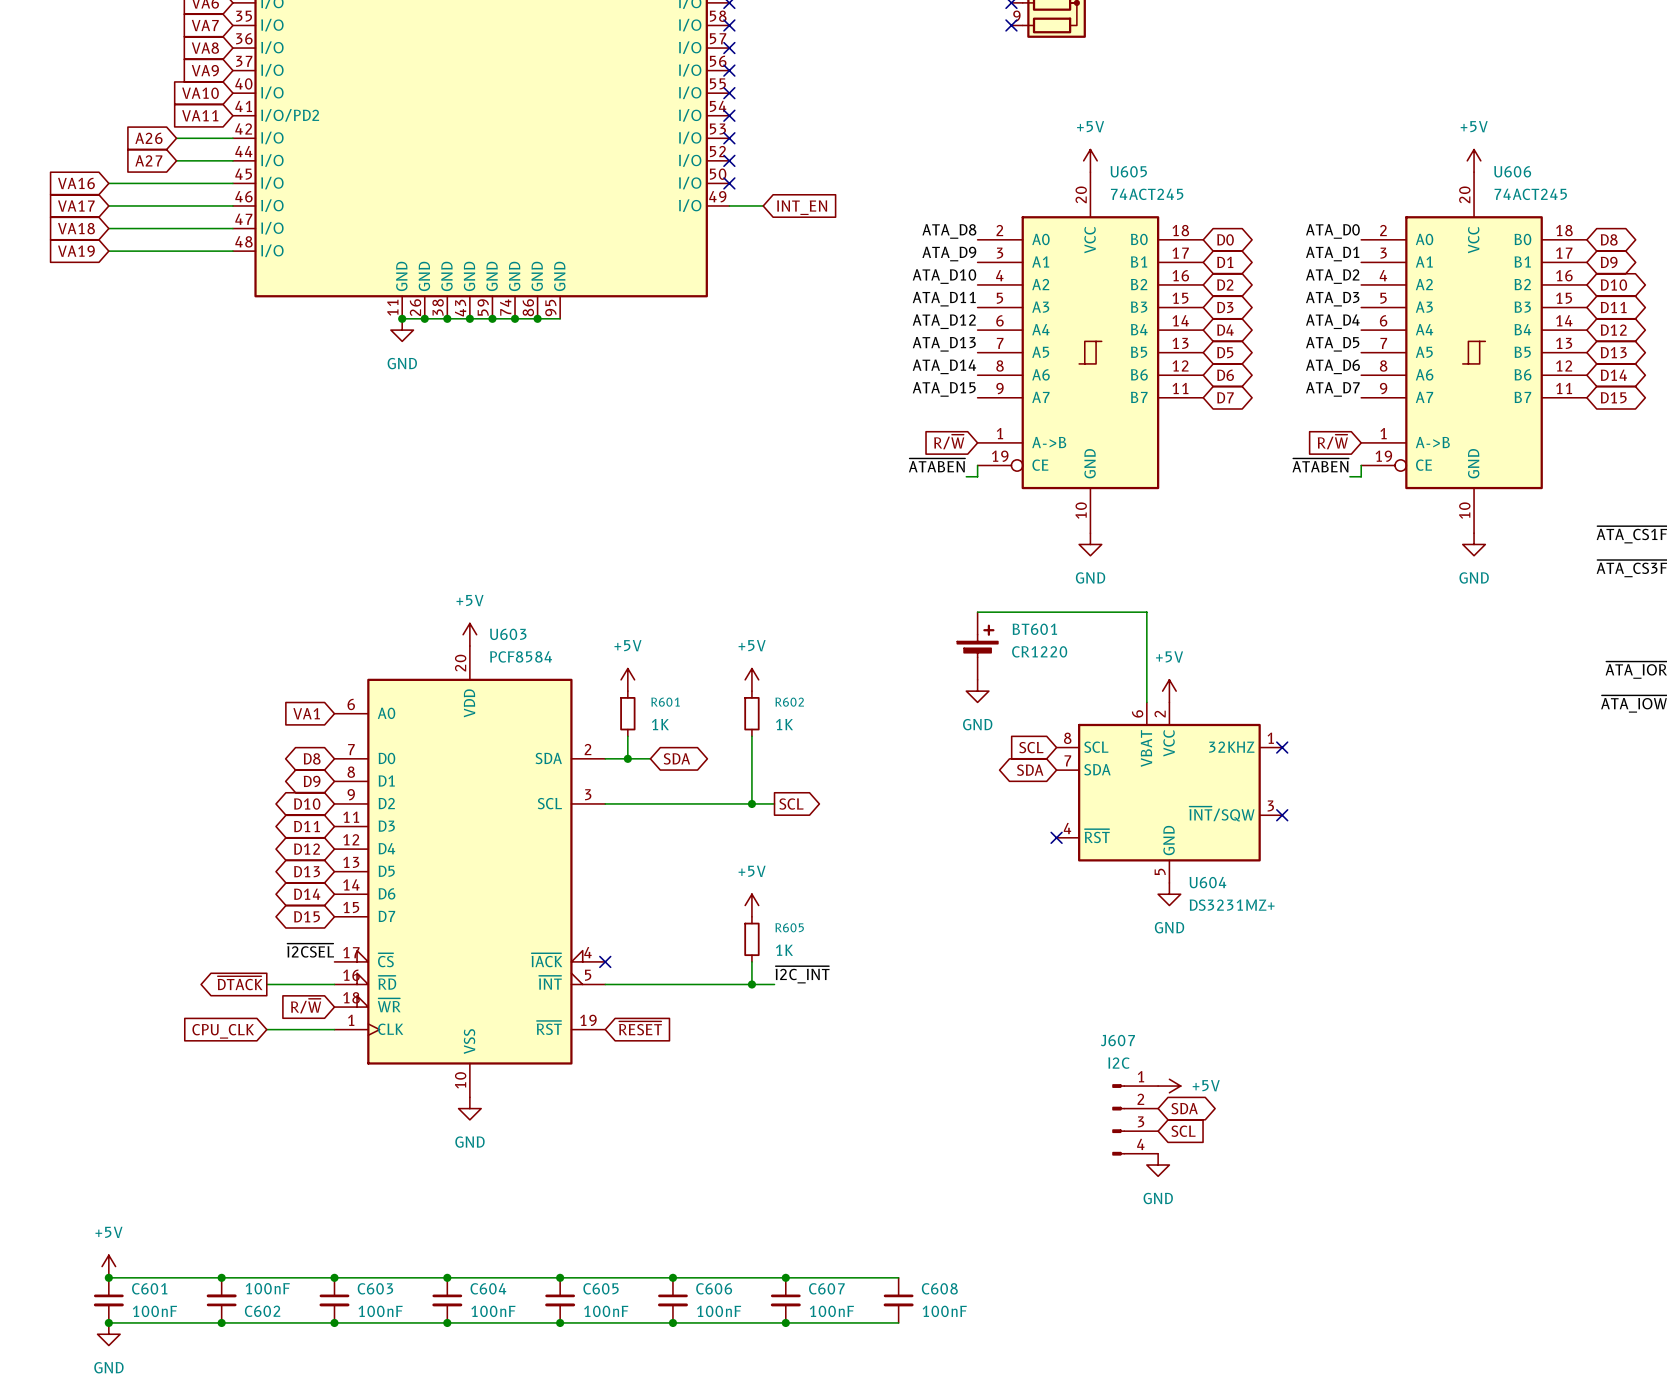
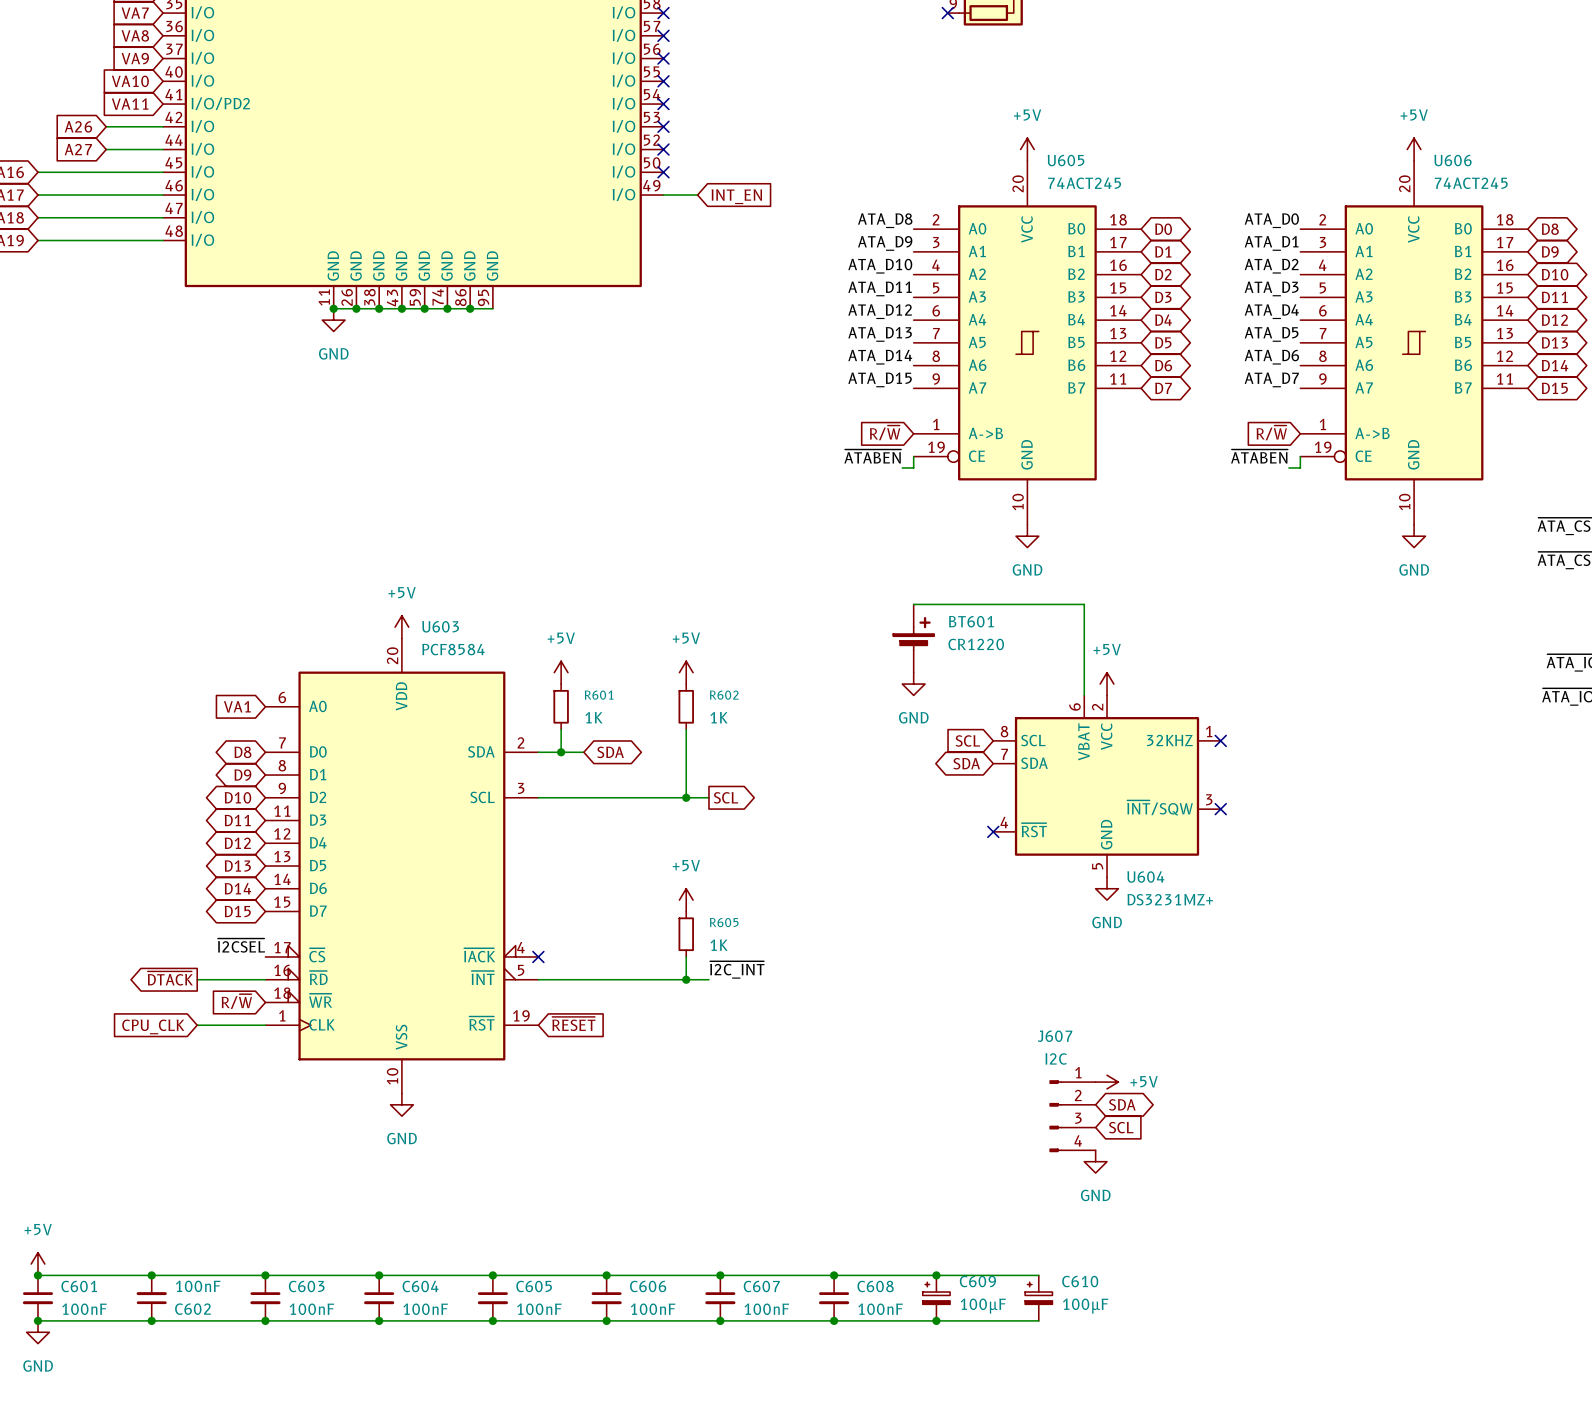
wire: none -> (834, 1275) (1038, 1275)
junction: none -> (834, 1275)
junction: none -> (936, 1275)
C609: none -> 100µF (936, 1298)
C610: none -> 100µF (1038, 1298)
wire: none -> (834, 1320) (1038, 1320)
junction: none -> (834, 1320)
junction: none -> (936, 1320)

